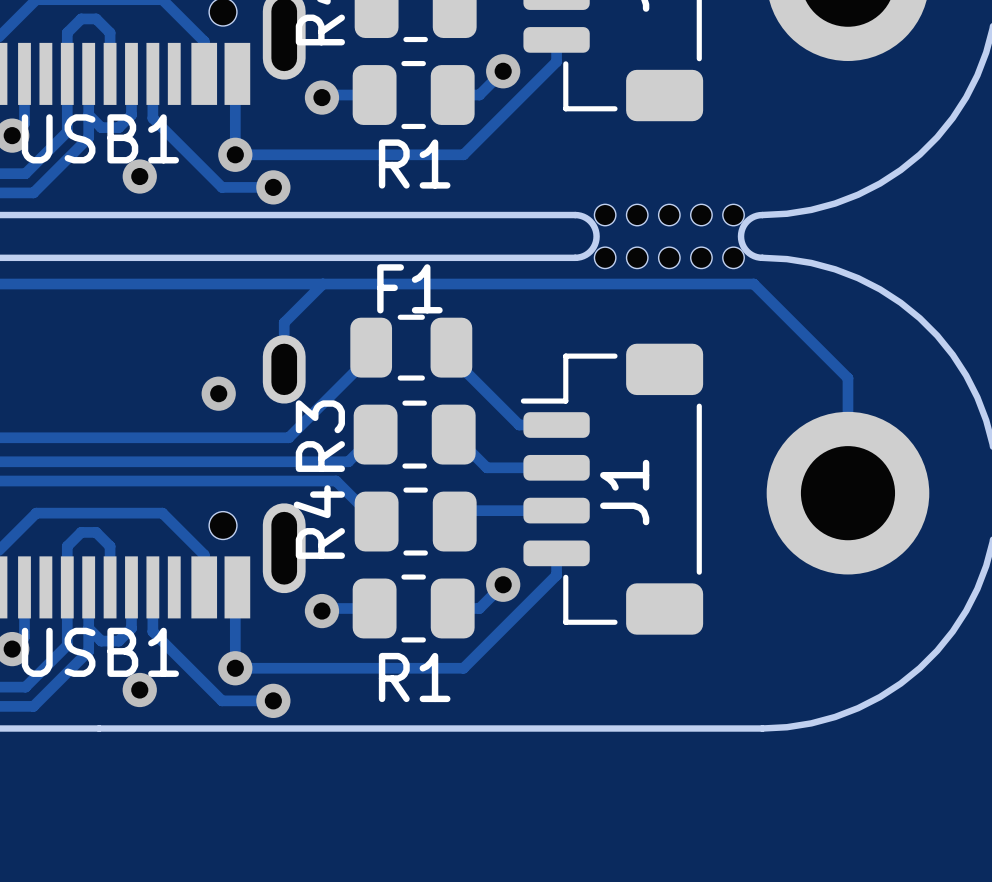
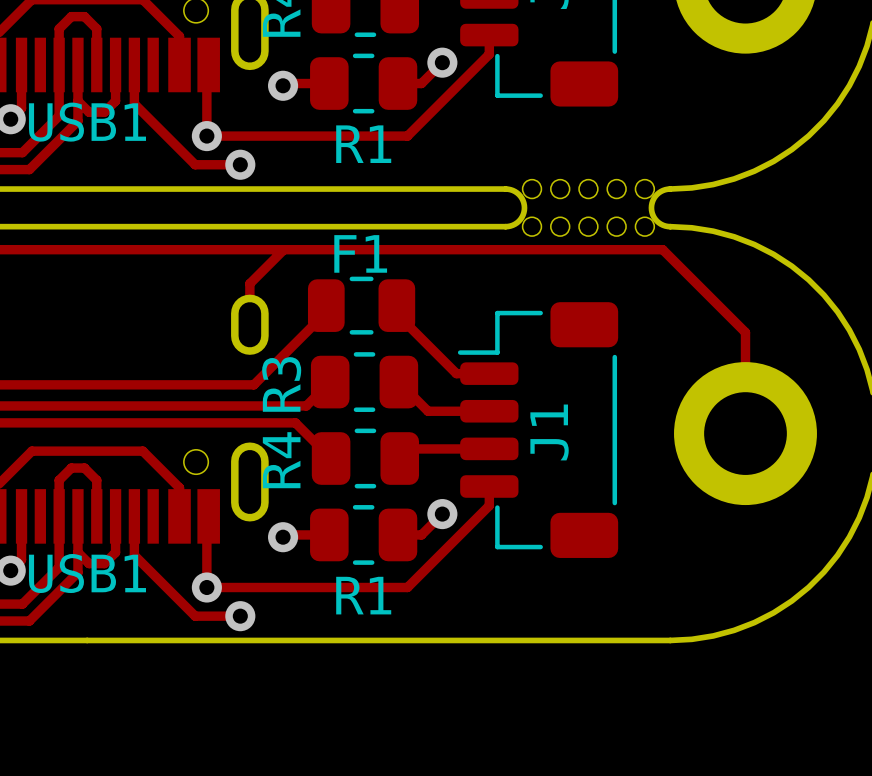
via: (139, 176) -> none
via: (218, 393) -> none
via: (139, 690) -> none

